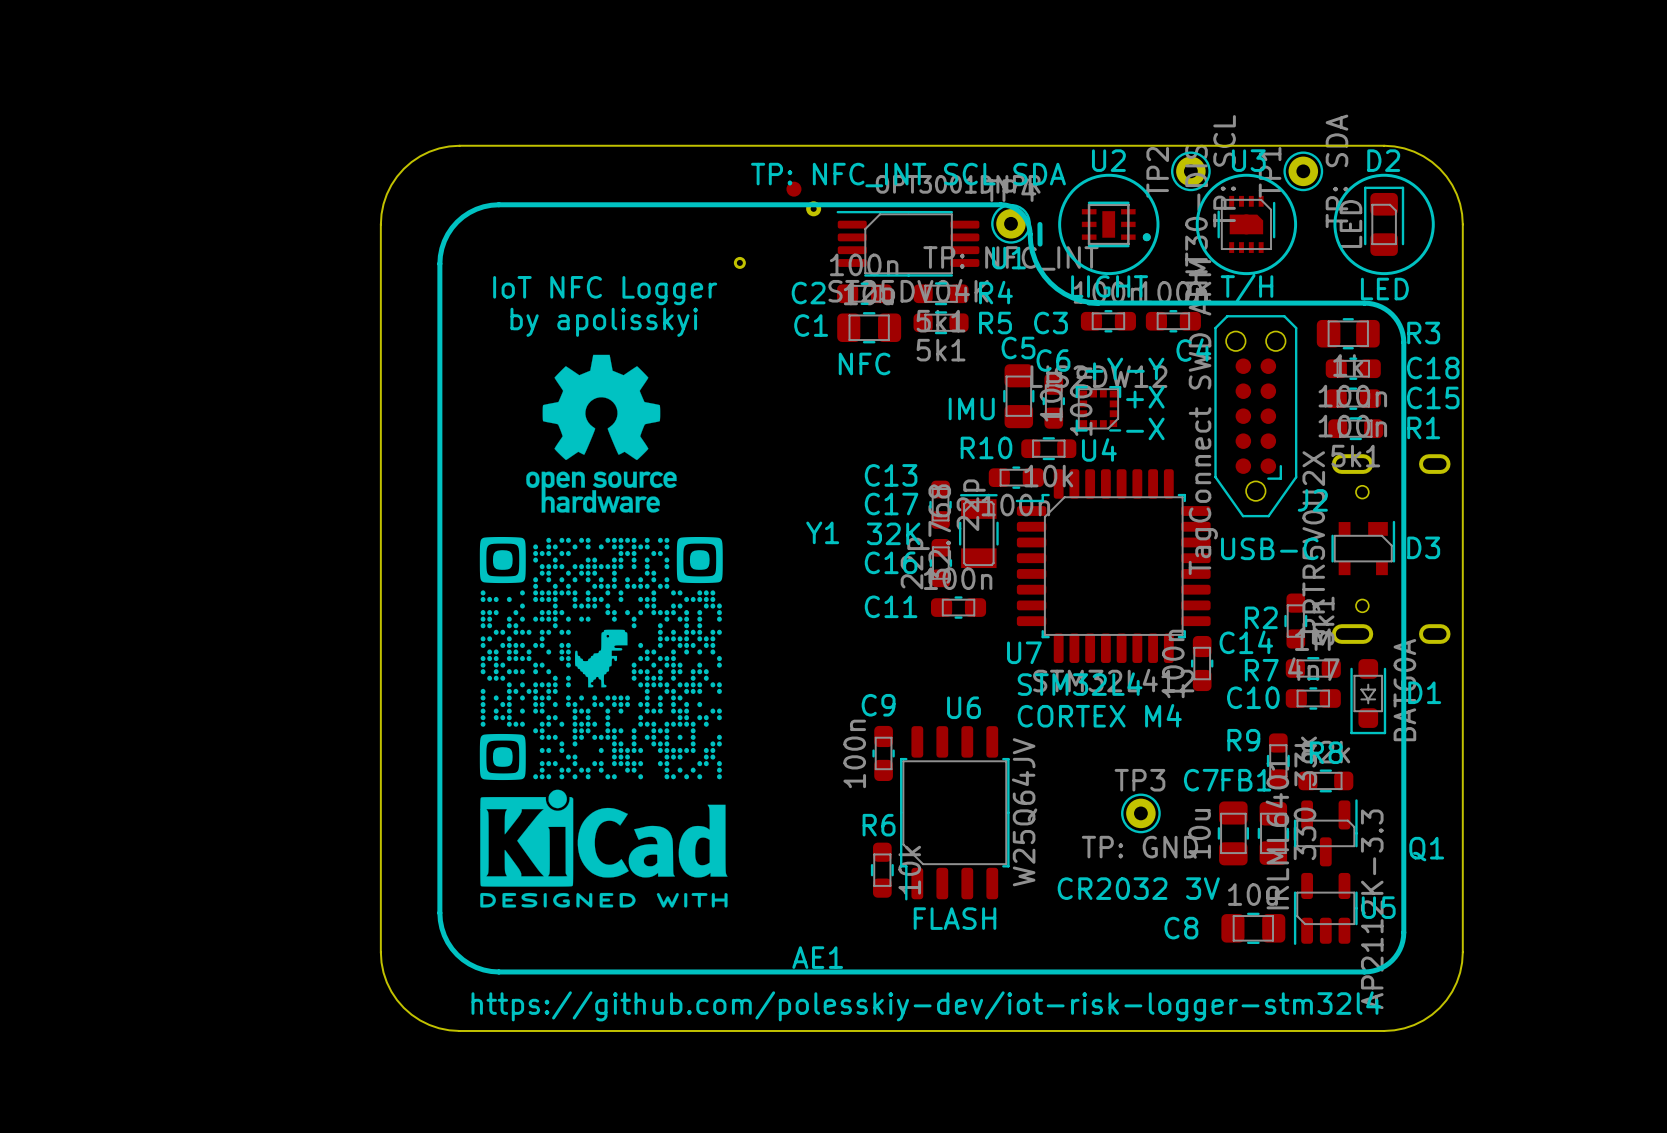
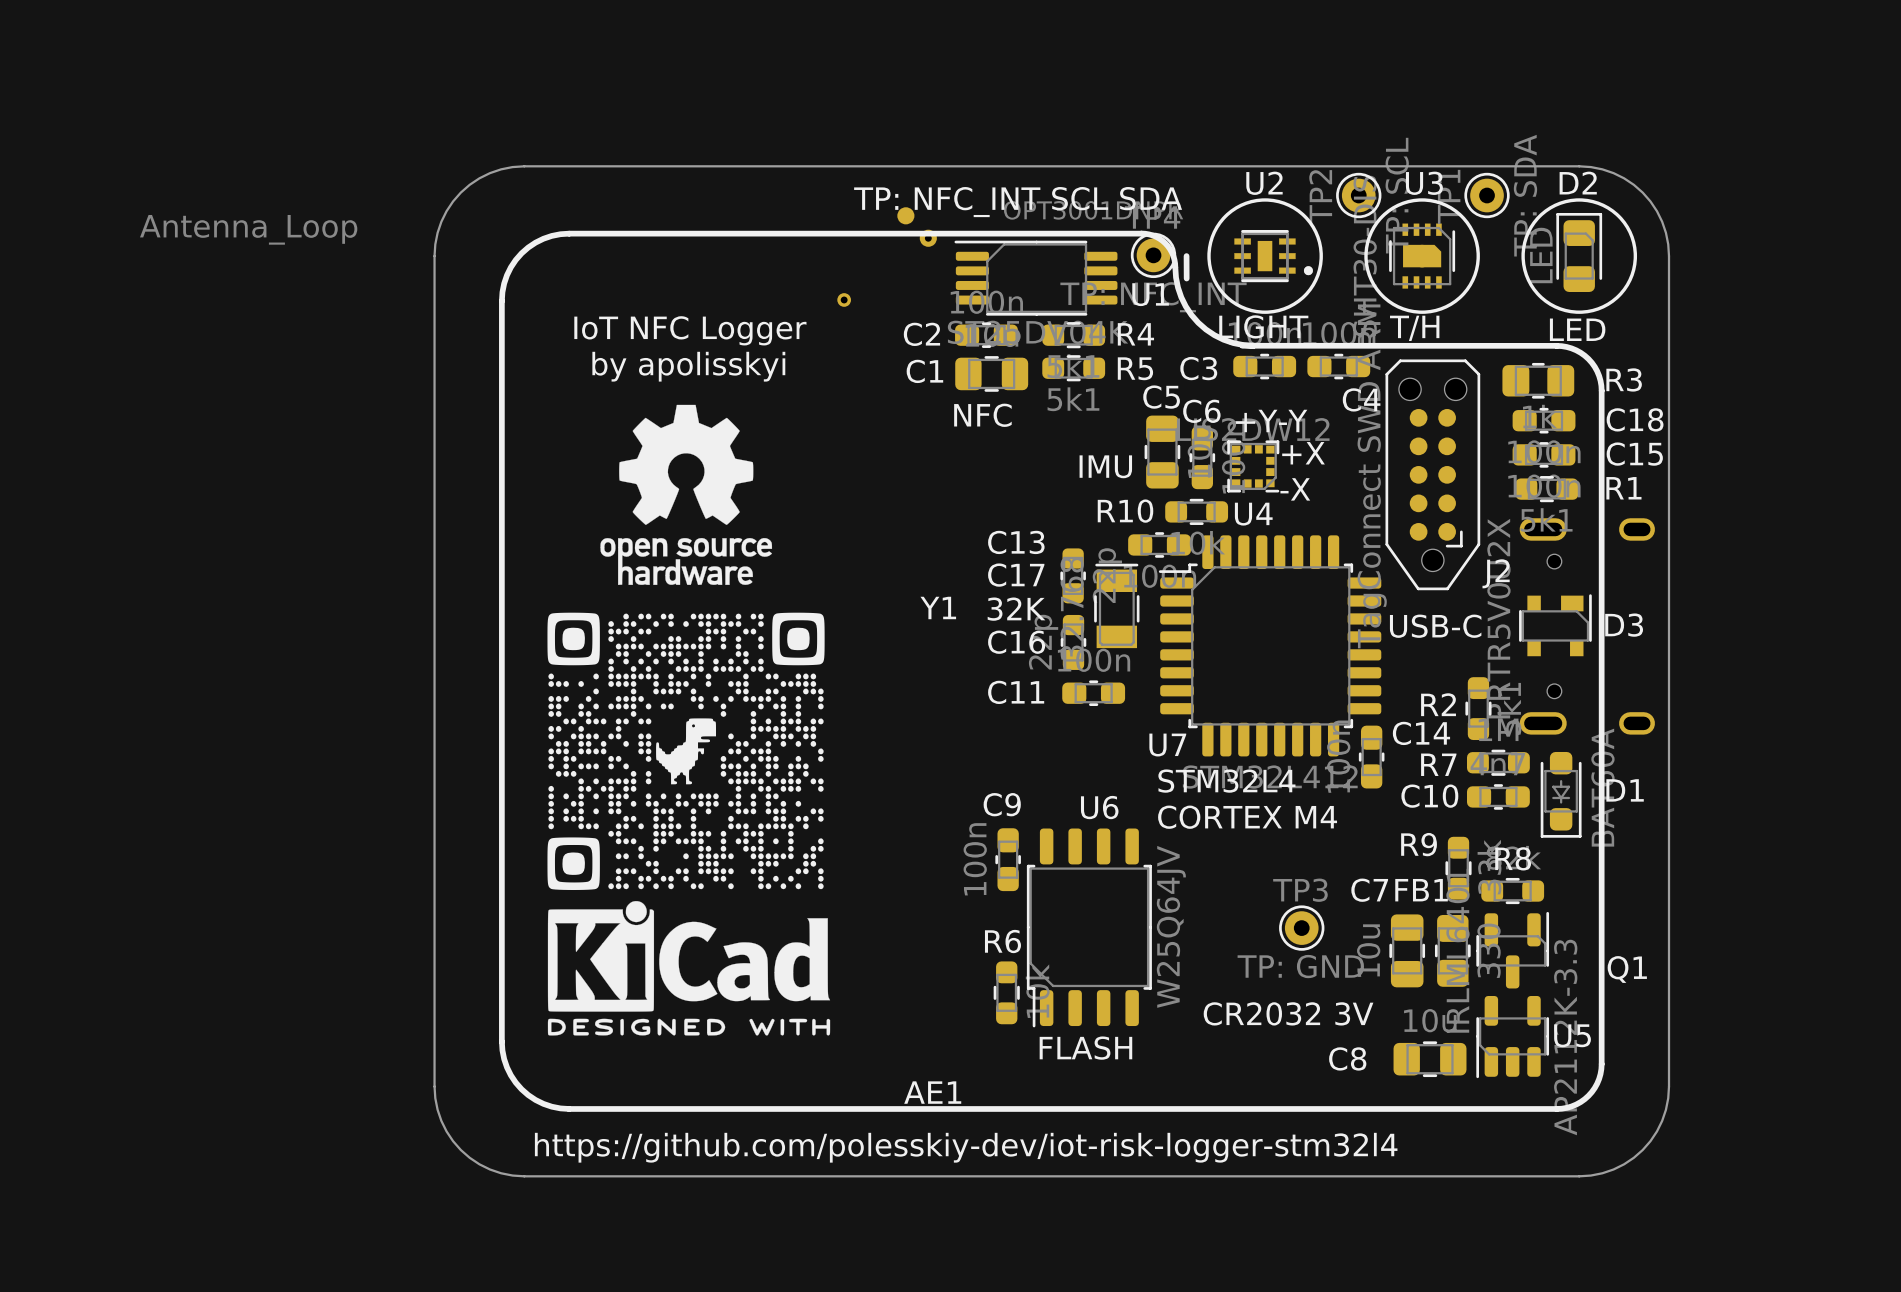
AE1 value: none -> Antenna_Loop (248, 229)

